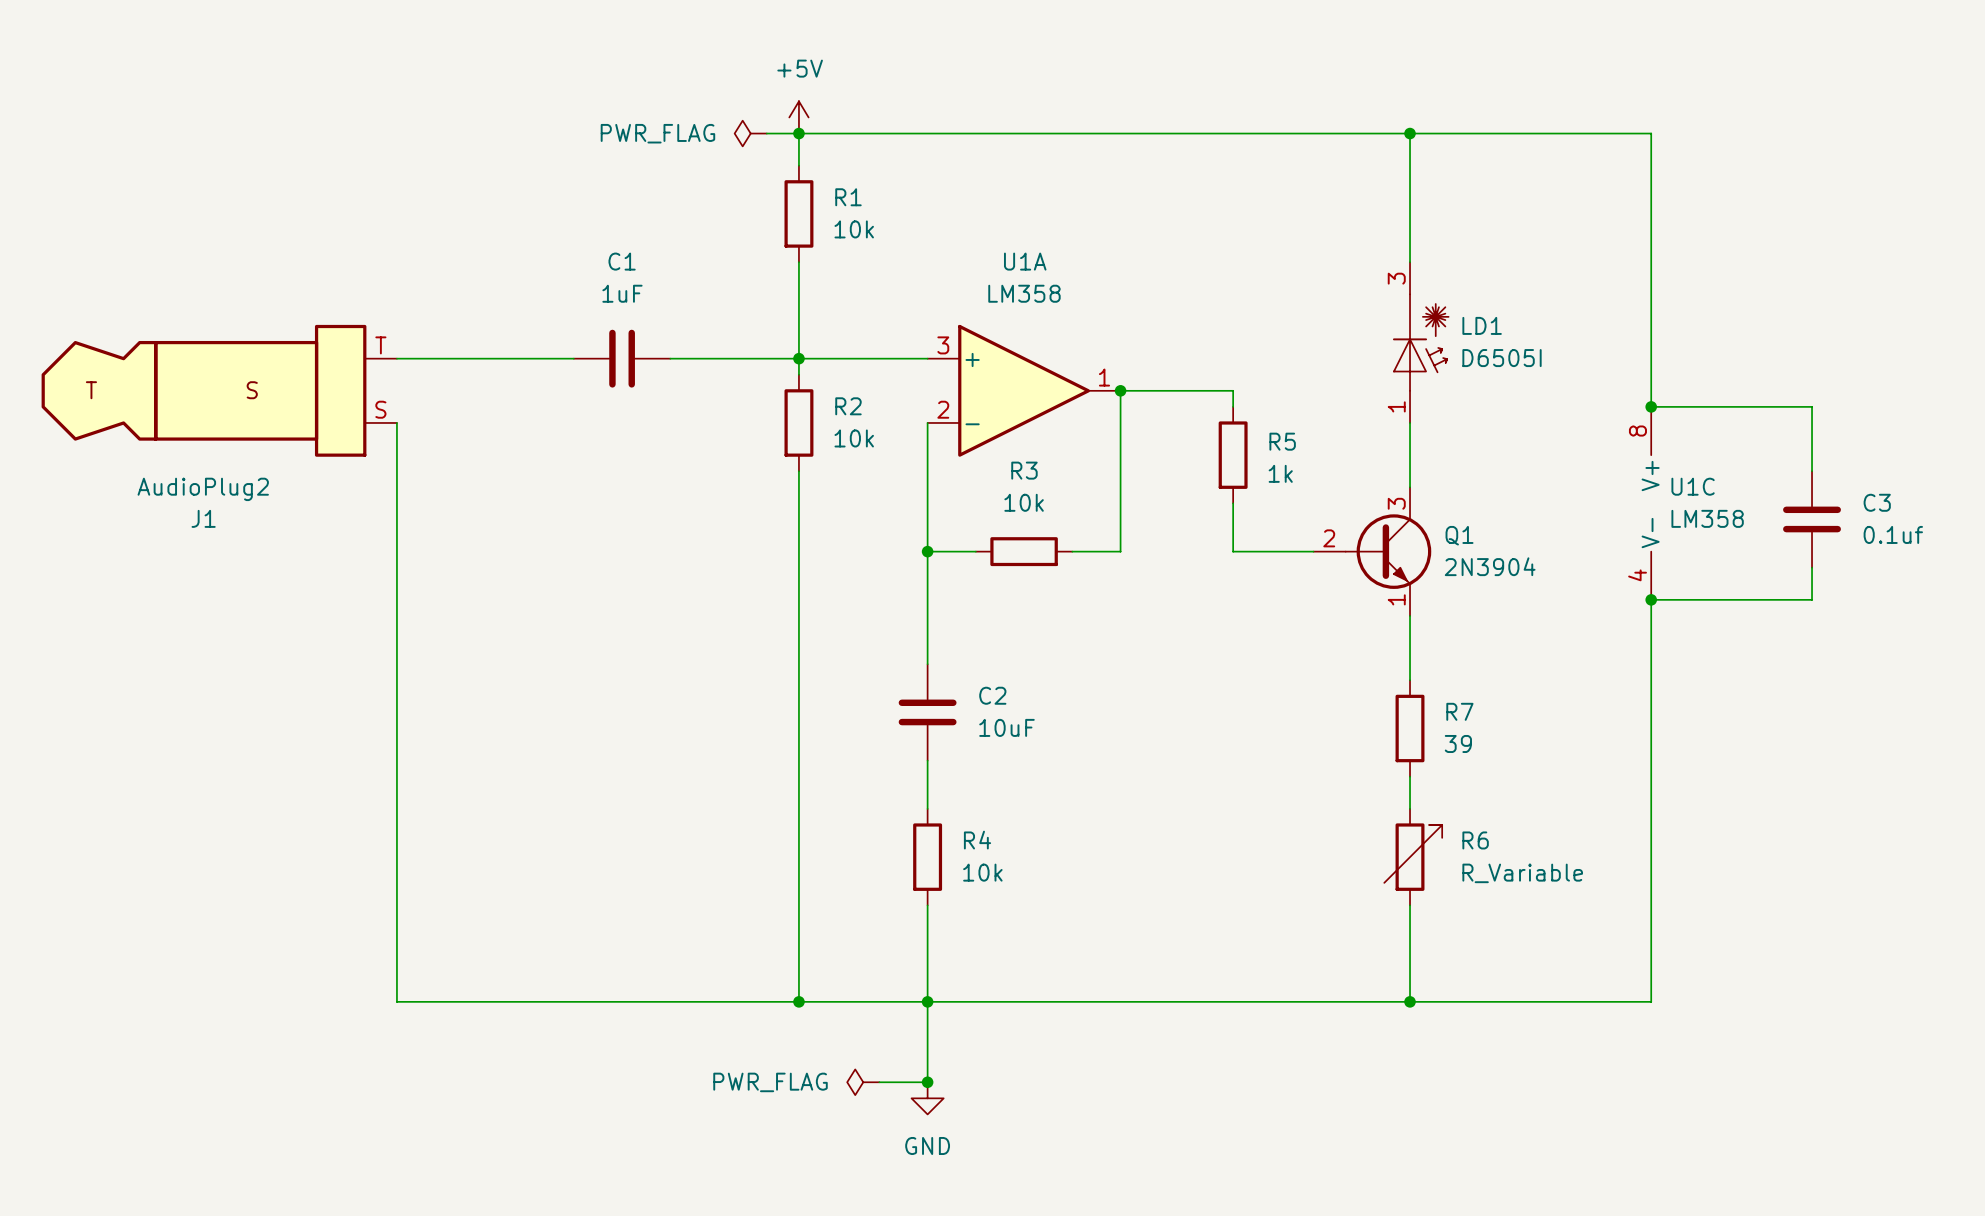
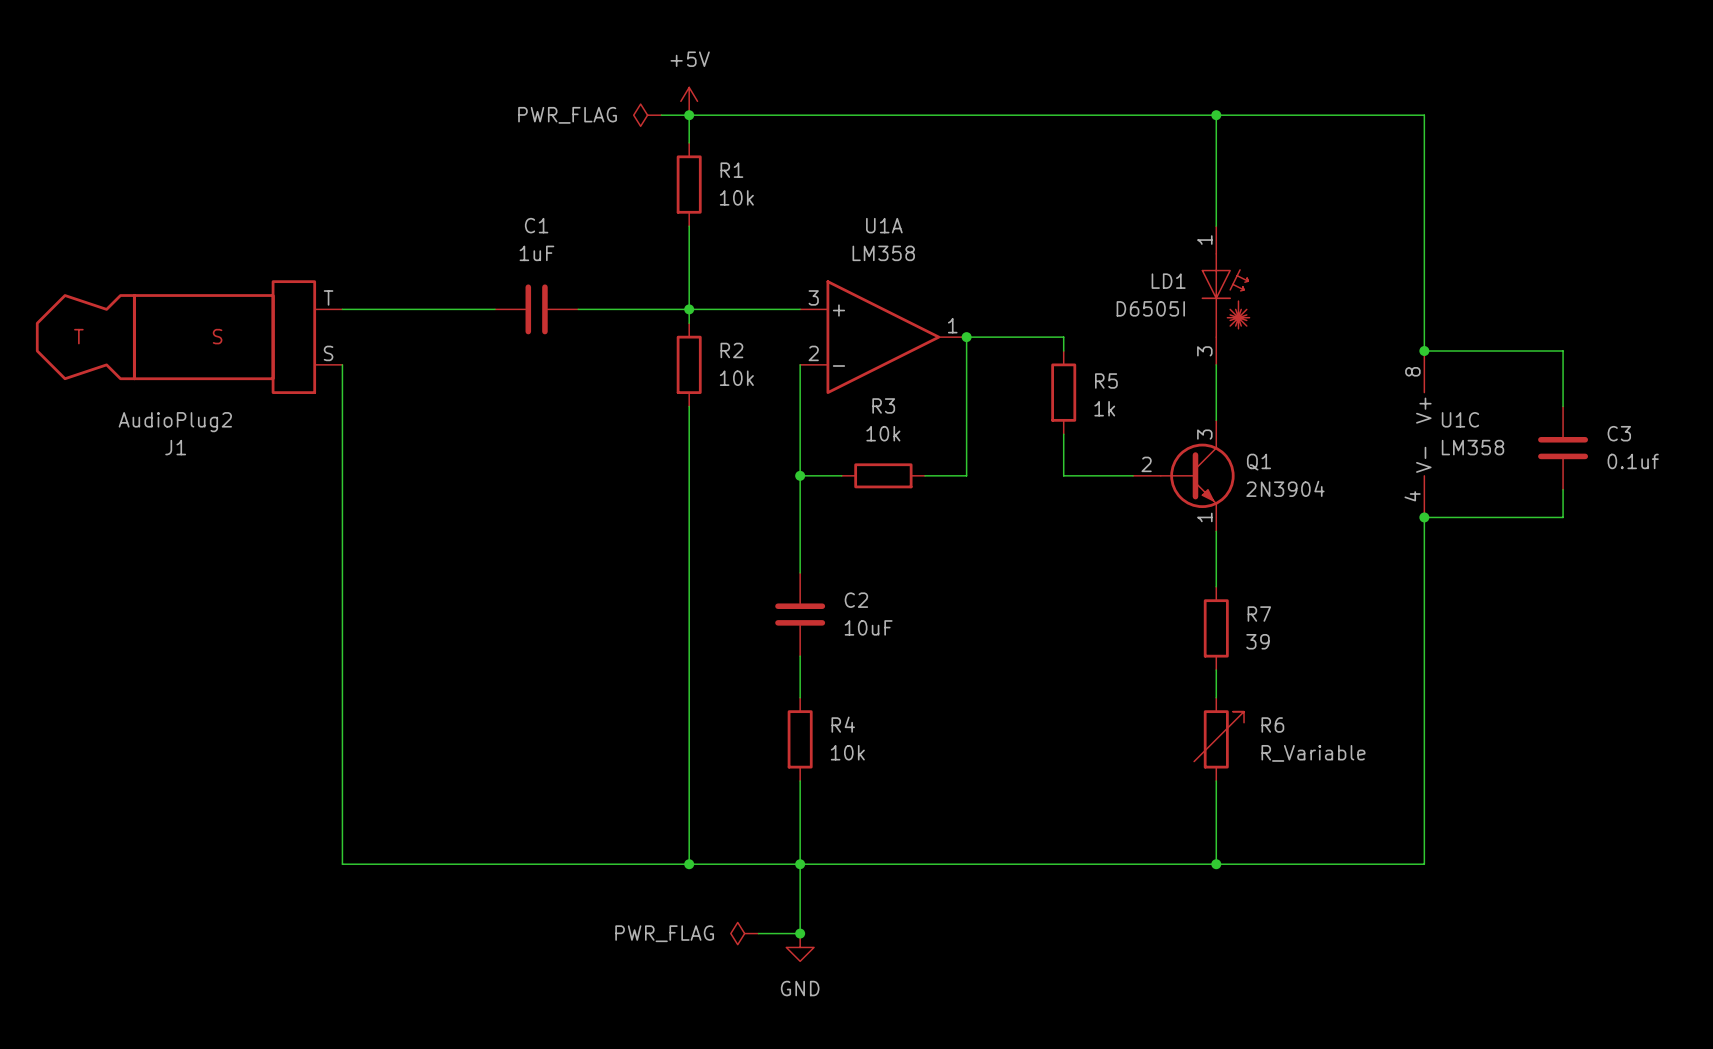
LD1 name position: LD1 (1482, 325) -> LD1 (1168, 281)
LD1 flip: as is (1420, 342) -> up-down (1225, 295)
LD1 value position: D6505I (1502, 358) -> D6505I (1150, 308)

